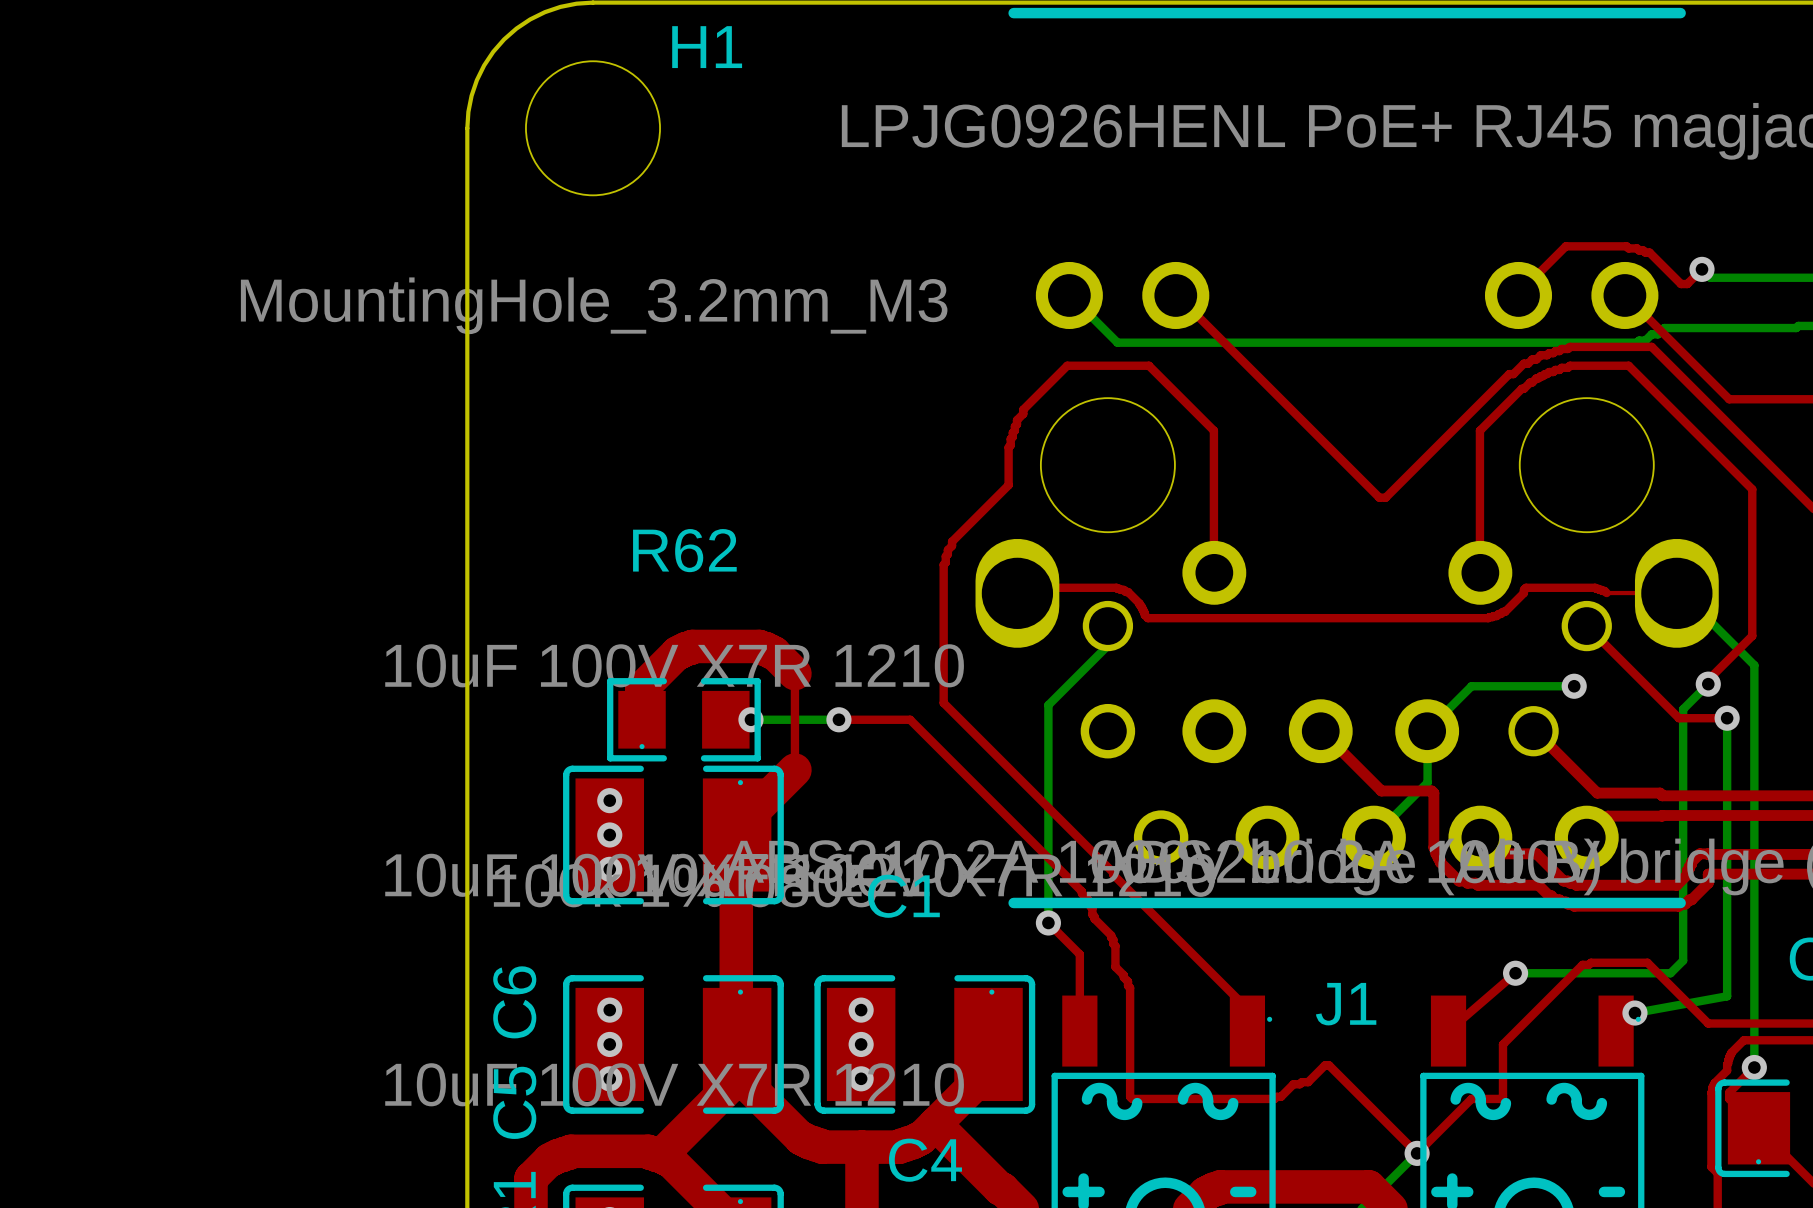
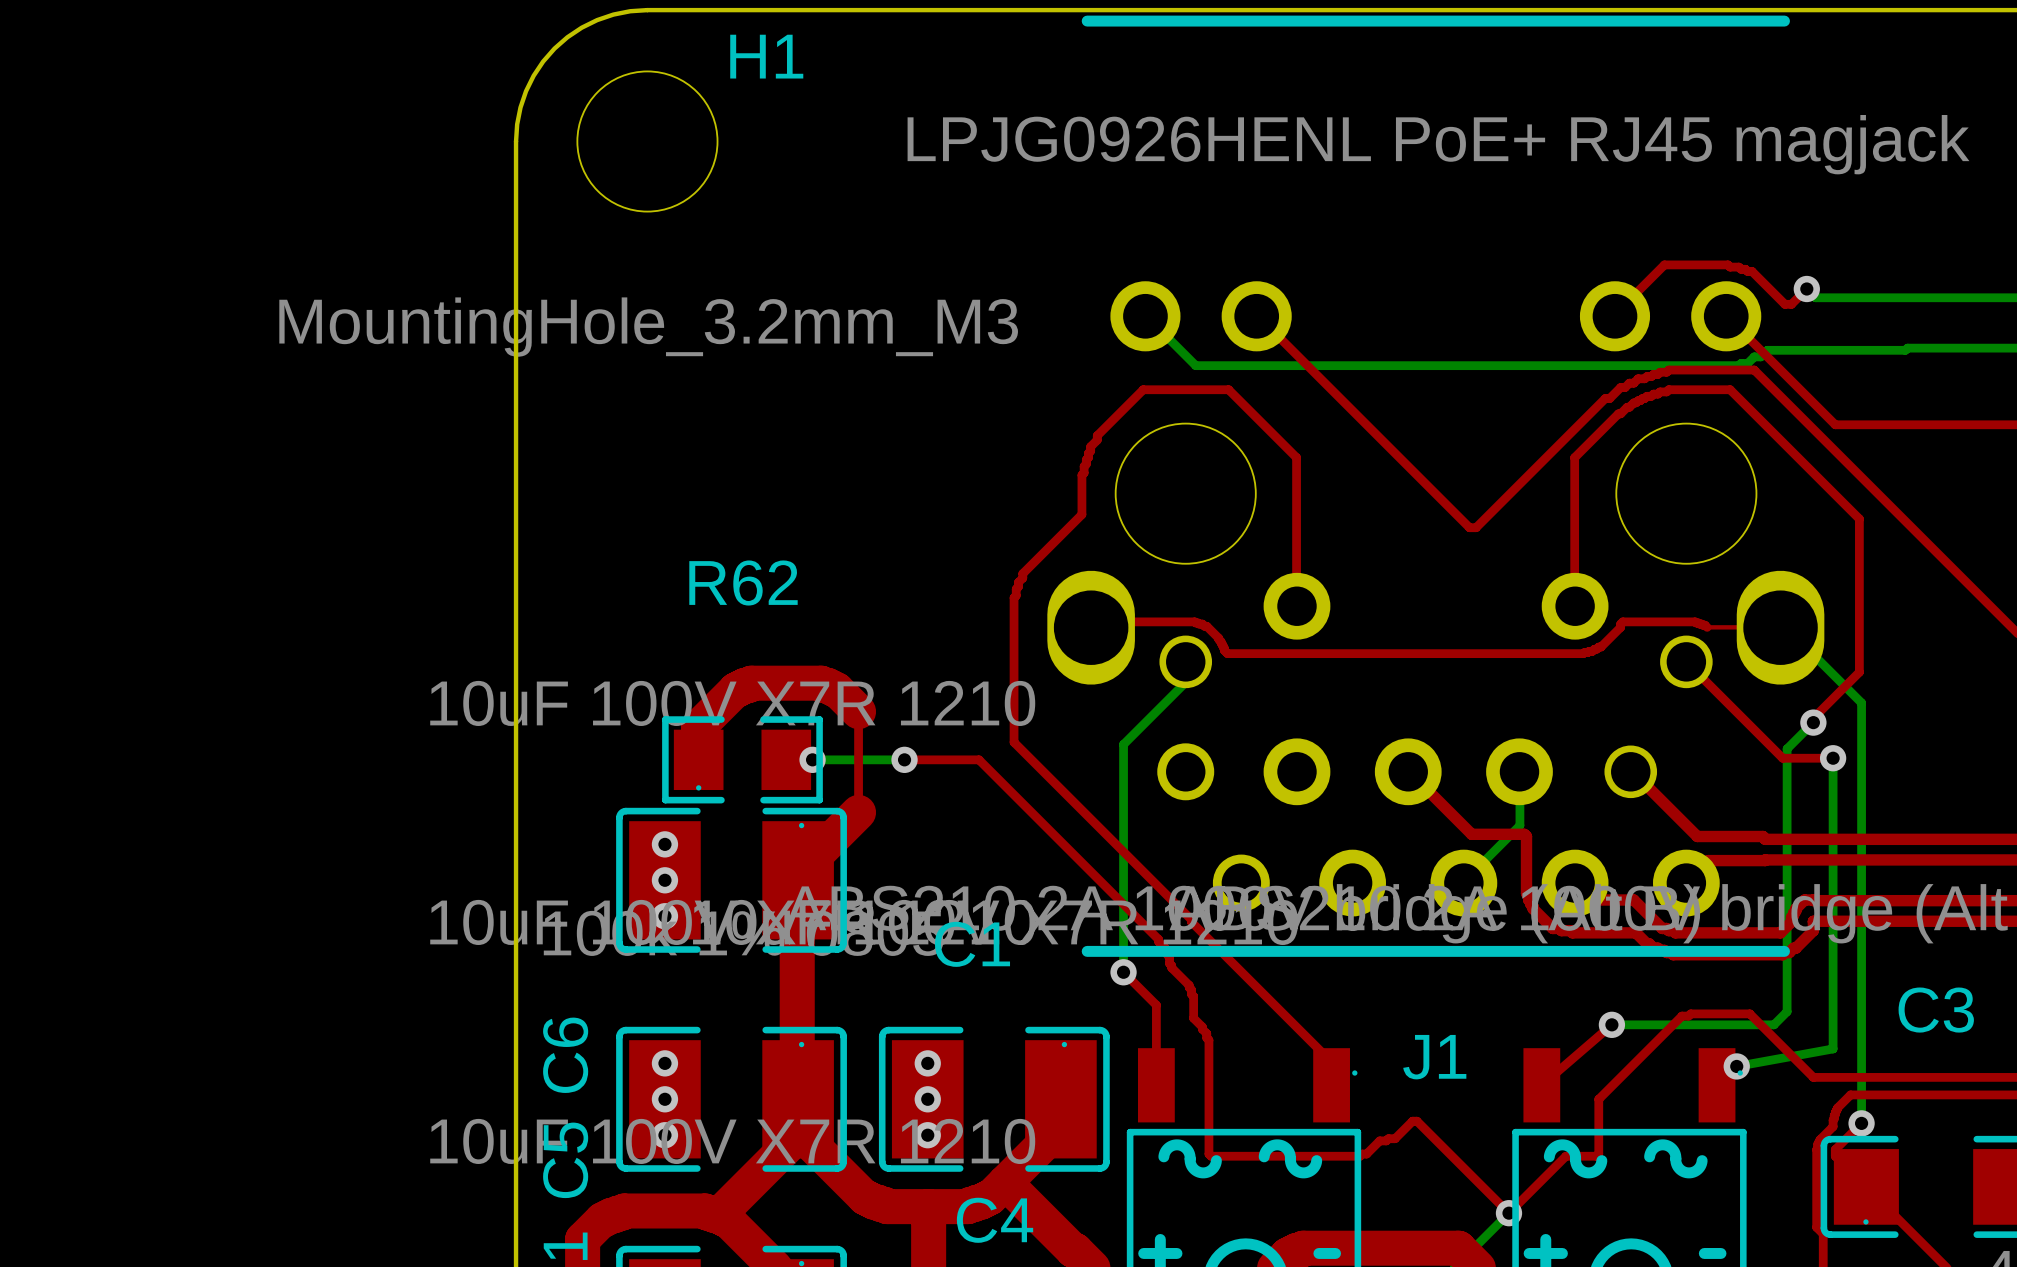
bottom track: (1574, 686) (1471, 686) (1427, 730) -> none
via: (1574, 686) -> none

